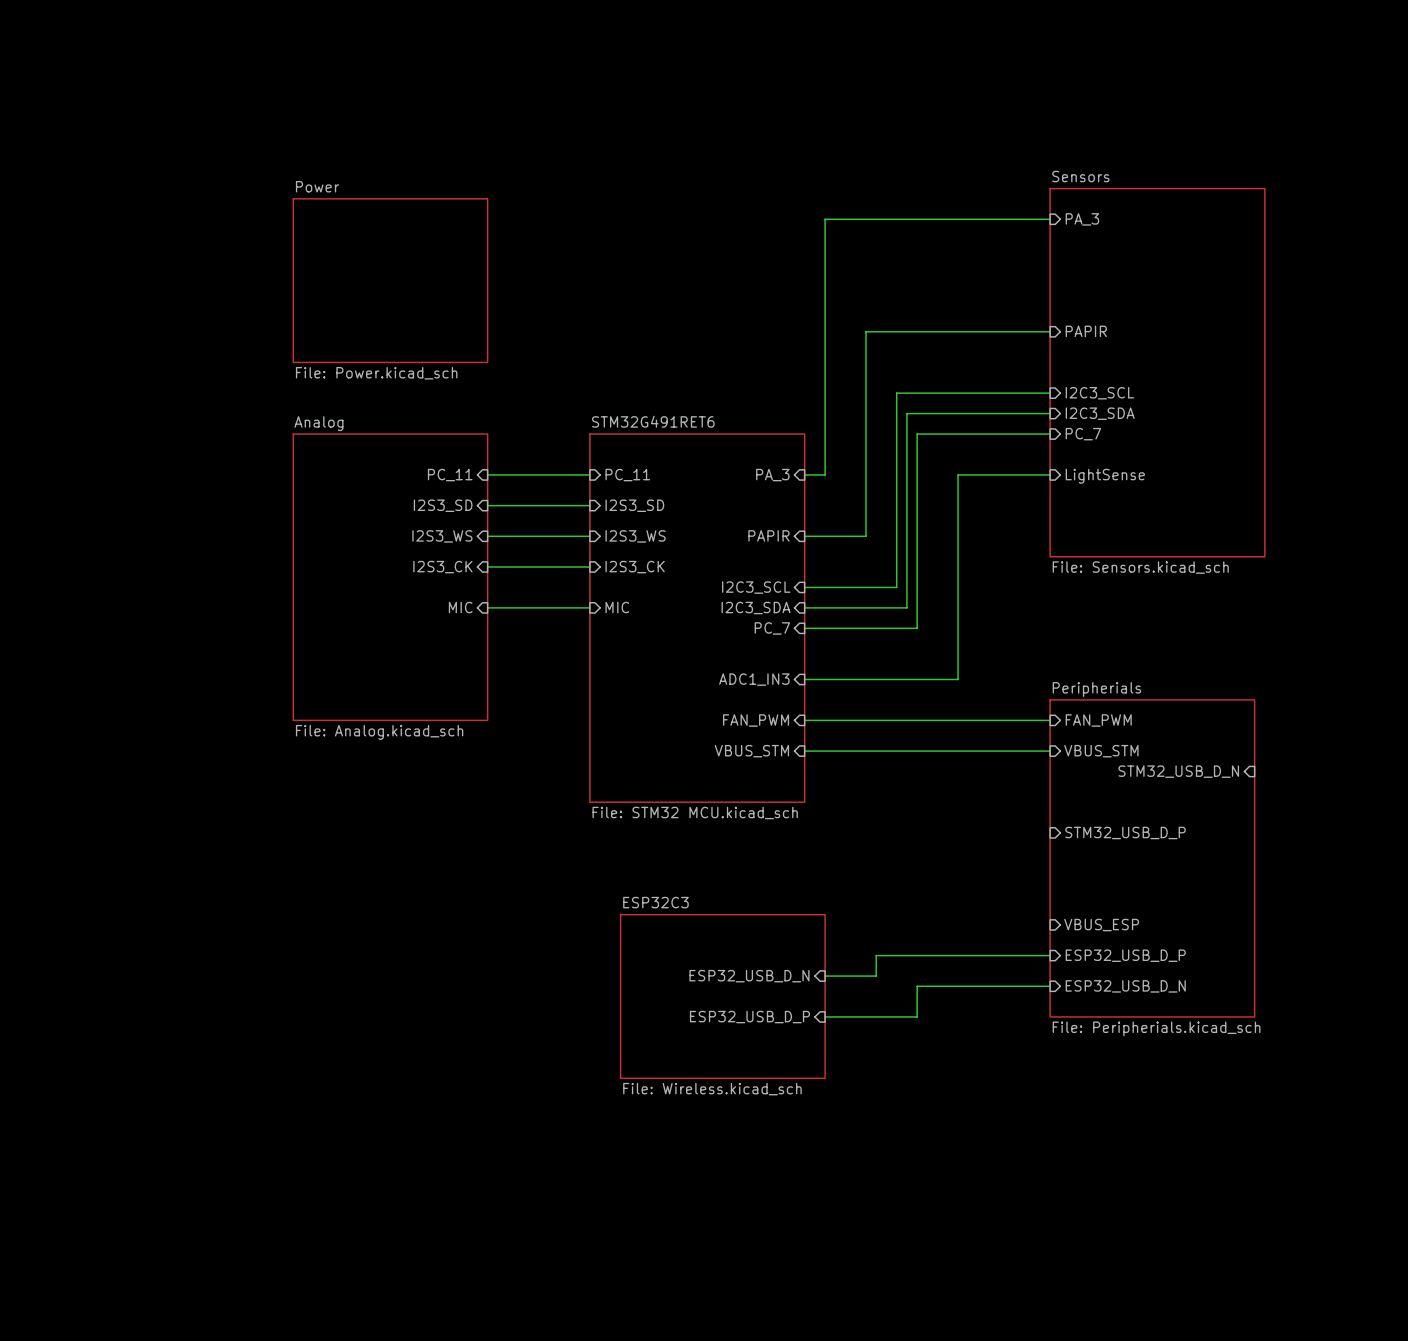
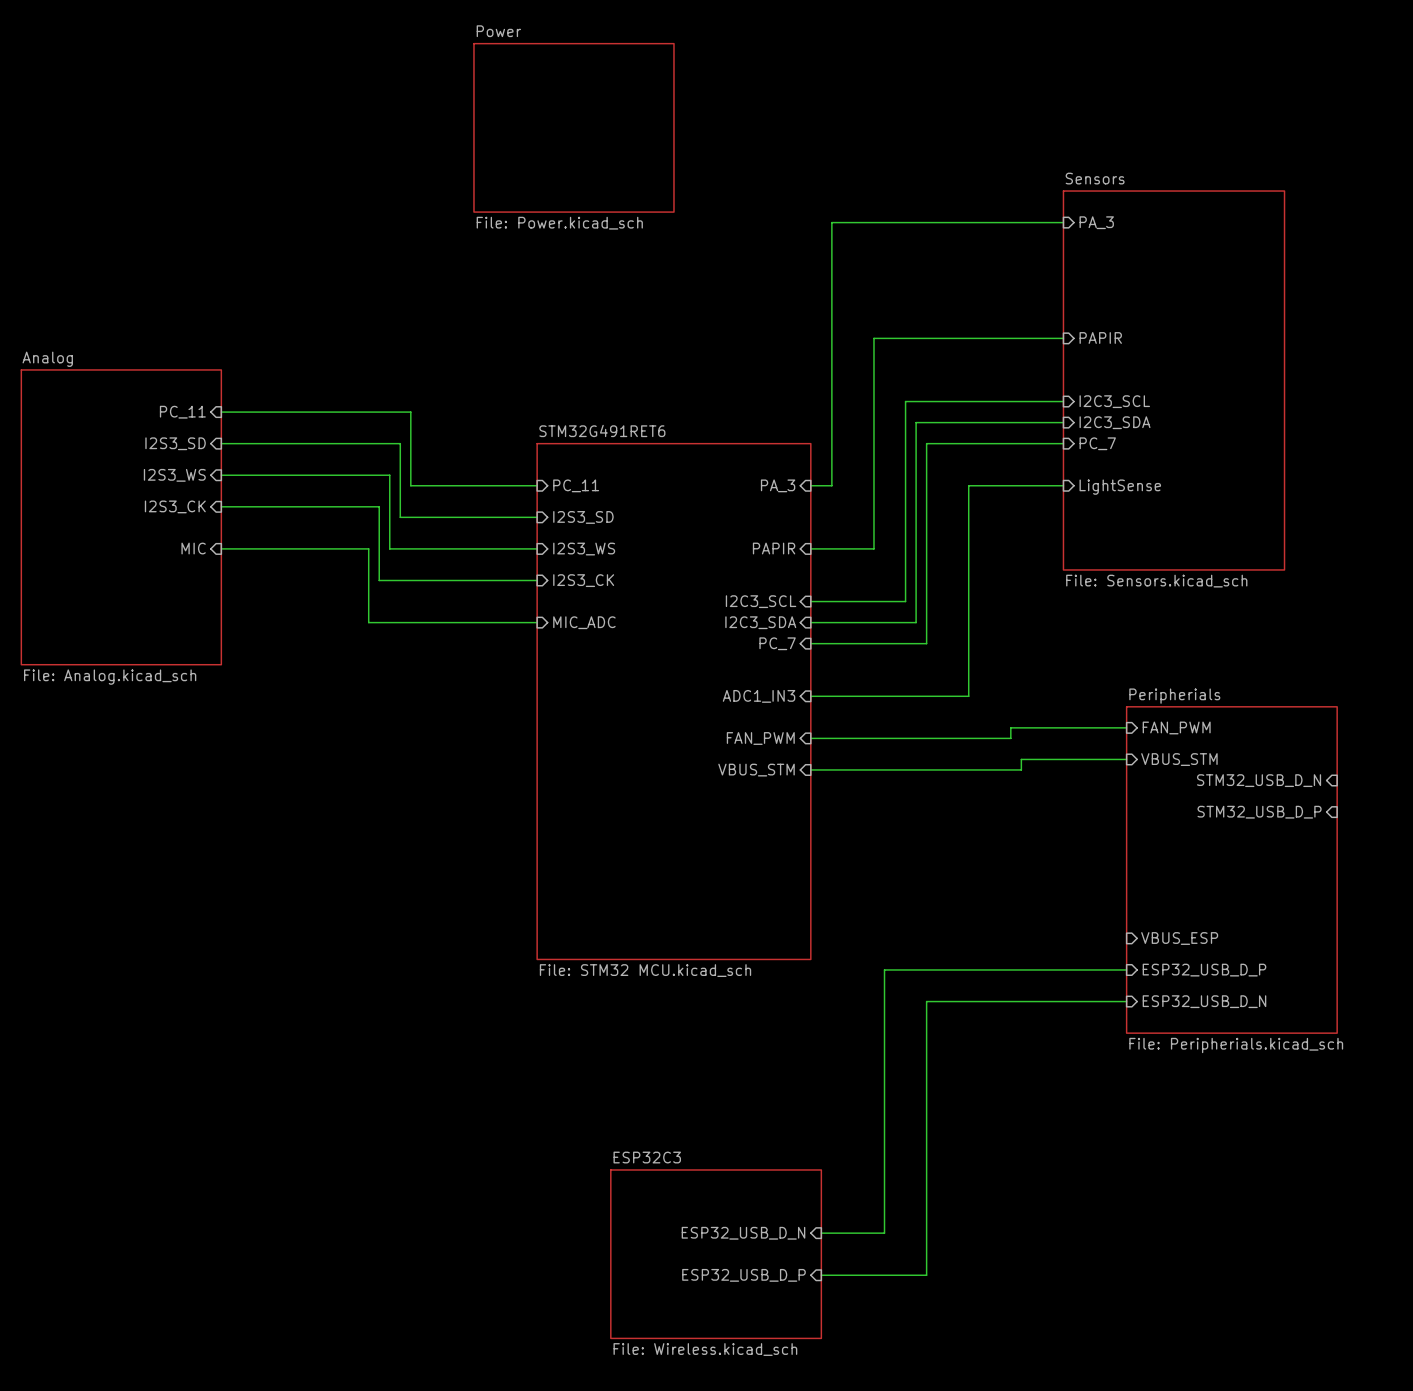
sheet Power: none -> File: Power.kicad_sch (573, 127)
sheet Power: File: Power.kicad_sch (390, 280) -> none
sheet pin: none -> PC_11 (182, 412)
wire: none -> (221, 412) (410, 412) (410, 485) (484, 485)
sheet STM32G491RET6 name position: STM32G491RET6 (653, 421) -> STM32G491RET6 (602, 430)
sheet STM32G491RET6 shape: [589, 433, 806, 803] -> [536, 443, 812, 961]
sheet pin: none -> I2S3_SD (175, 443)
wire: none -> (221, 443) (400, 443) (400, 517) (484, 517)
sheet pin: none -> I2S3_WS (174, 475)
wire: none -> (221, 475) (389, 475) (389, 548) (484, 548)
wire: (538, 474) (589, 474) -> none
sheet pin: PC_11 (450, 475) -> none
sheet pin position: PC_11 (627, 475) -> PC_11 (576, 485)
sheet pin: none -> I2S3_CK (175, 506)
wire: none -> (221, 506) (379, 506) (379, 580) (484, 580)
sheet Analog: none -> File: Analog.kicad_sch (121, 517)
sheet pin: I2S3_SD (443, 505) -> none
wire: (538, 505) (589, 505) -> none
sheet pin position: I2S3_SD (634, 505) -> I2S3_SD (583, 517)
sheet pin: none -> MIC (193, 548)
wire: none -> (221, 548) (368, 548) (368, 622) (484, 622)
sheet pin: I2S3_WS (442, 536) -> none
wire: (538, 536) (589, 536) -> none
sheet pin position: I2S3_WS (635, 536) -> I2S3_WS (584, 549)
wire: (538, 566) (589, 566) -> none
sheet pin: I2S3_CK (442, 567) -> none
sheet pin position: I2S3_CK (635, 567) -> I2S3_CK (583, 580)
sheet Analog: File: Analog.kicad_sch (390, 577) -> none
sheet pin: MIC (460, 607) -> none
wire: (538, 607) (589, 607) -> none
sheet pin: MIC (617, 607) -> none
sheet pin: none -> MIC_ADC (584, 622)
wire: (998, 720) (1050, 720) -> (1010, 738) (1010, 727) (1126, 727)
sheet pin position: FAN_PWM (1098, 720) -> FAN_PWM (1176, 727)
wire: (1009, 751) (1050, 751) -> (1021, 769) (1021, 759) (1126, 759)
sheet pin position: VBUS_STM (1101, 751) -> VBUS_STM (1179, 759)
sheet pin position: STM32_USB_D_N (1178, 771) -> STM32_USB_D_N (1259, 780)
sheet pin: none -> STM32_USB_D_P (1259, 812)
sheet STM32G491RET6 value position: File: STM32 MCU.kicad_sch (695, 812) -> File: STM32 MCU.kicad_sch (645, 970)
sheet pin: STM32_USB_D_P (1125, 832) -> none
sheet Peripherials position: (1152, 858) -> (1231, 869)
sheet pin position: VBUS_ESP (1101, 925) -> VBUS_ESP (1179, 938)
wire: (876, 955) (1050, 955) -> (884, 980) (884, 969) (1126, 969)
sheet pin position: ESP32_USB_D_P (1125, 955) -> ESP32_USB_D_P (1204, 970)
sheet pin: ESP32_USB_D_N (749, 976) -> none
wire: (825, 976) (876, 976) -> (821, 1233) (884, 1233) (884, 1001)
wire: (917, 986) (1050, 986) -> (926, 1012) (926, 1001) (1126, 1001)
sheet pin position: ESP32_USB_D_N (1125, 986) -> ESP32_USB_D_N (1204, 1001)
sheet ESP32C3 position: (722, 996) -> (716, 1254)
wire: (825, 1016) (917, 1016) -> (821, 1275) (926, 1275) (926, 1043)
sheet pin: ESP32_USB_D_P (749, 1017) -> none
sheet pin: none -> ESP32_USB_D_N (743, 1233)
sheet pin: none -> ESP32_USB_D_P (743, 1275)

